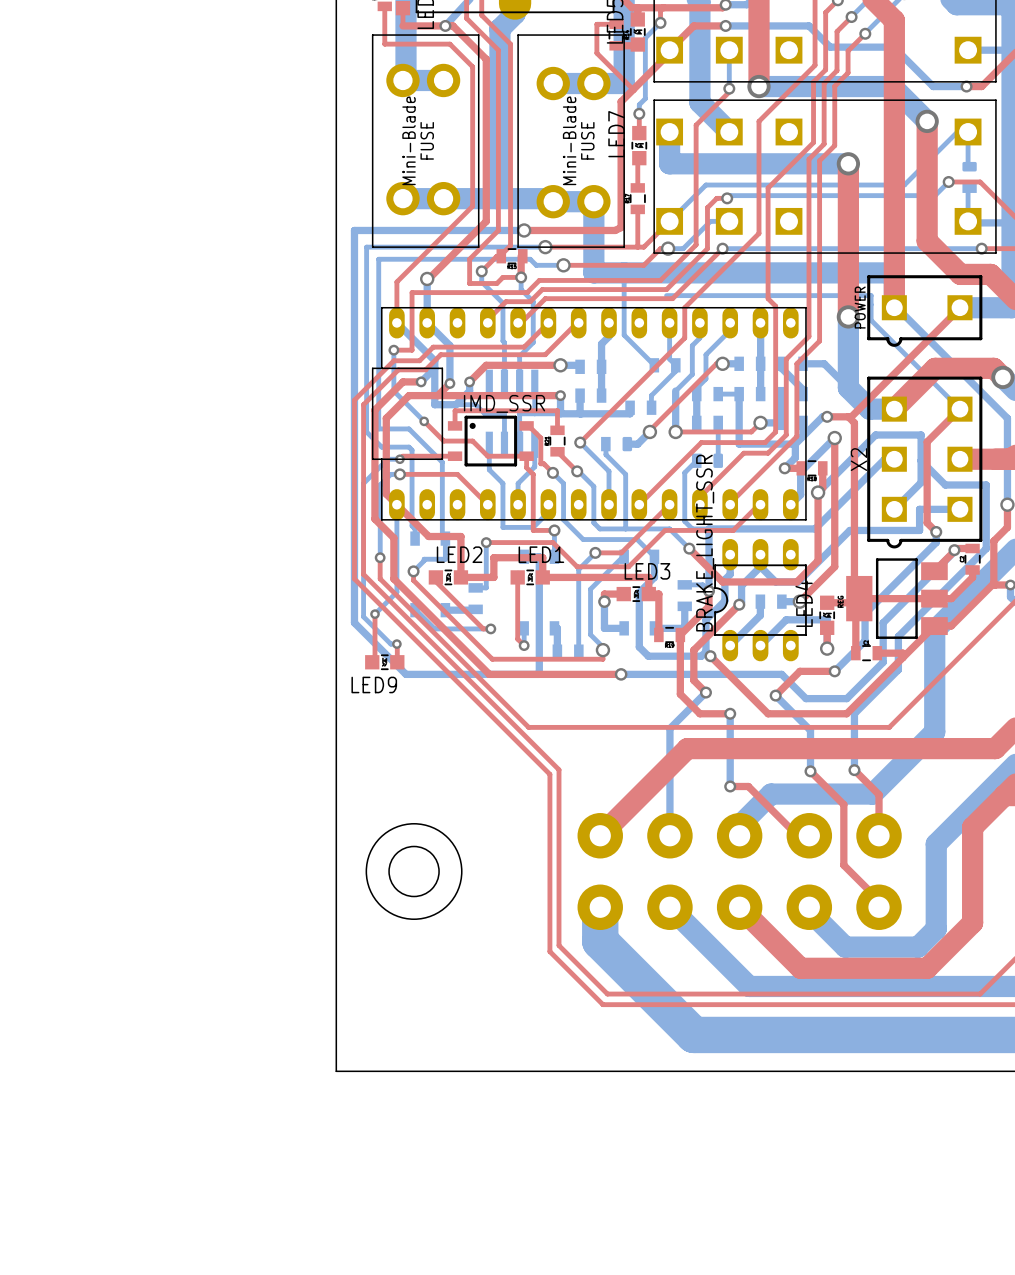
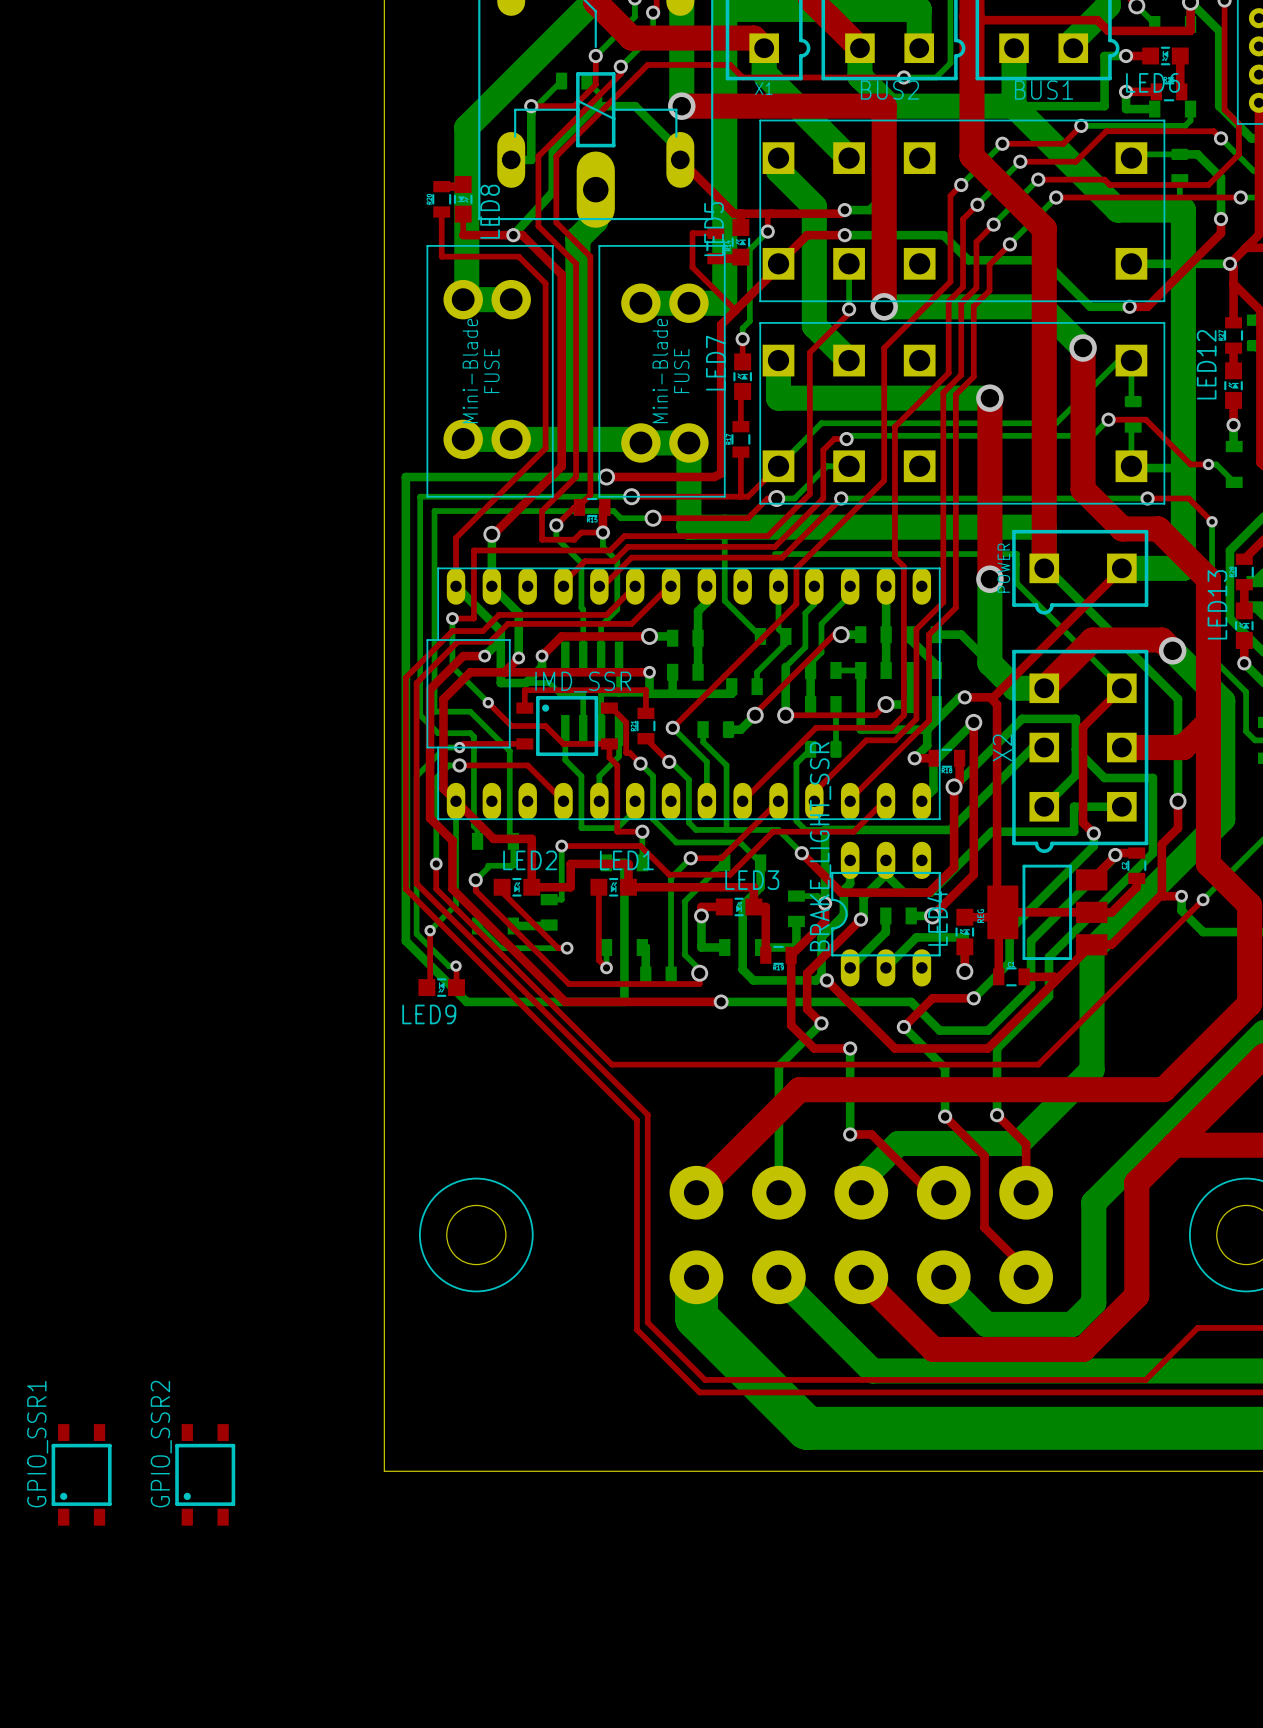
GPIO_SSR1: none -> (81, 1474)
GPIO_SSR2: none -> (205, 1474)

